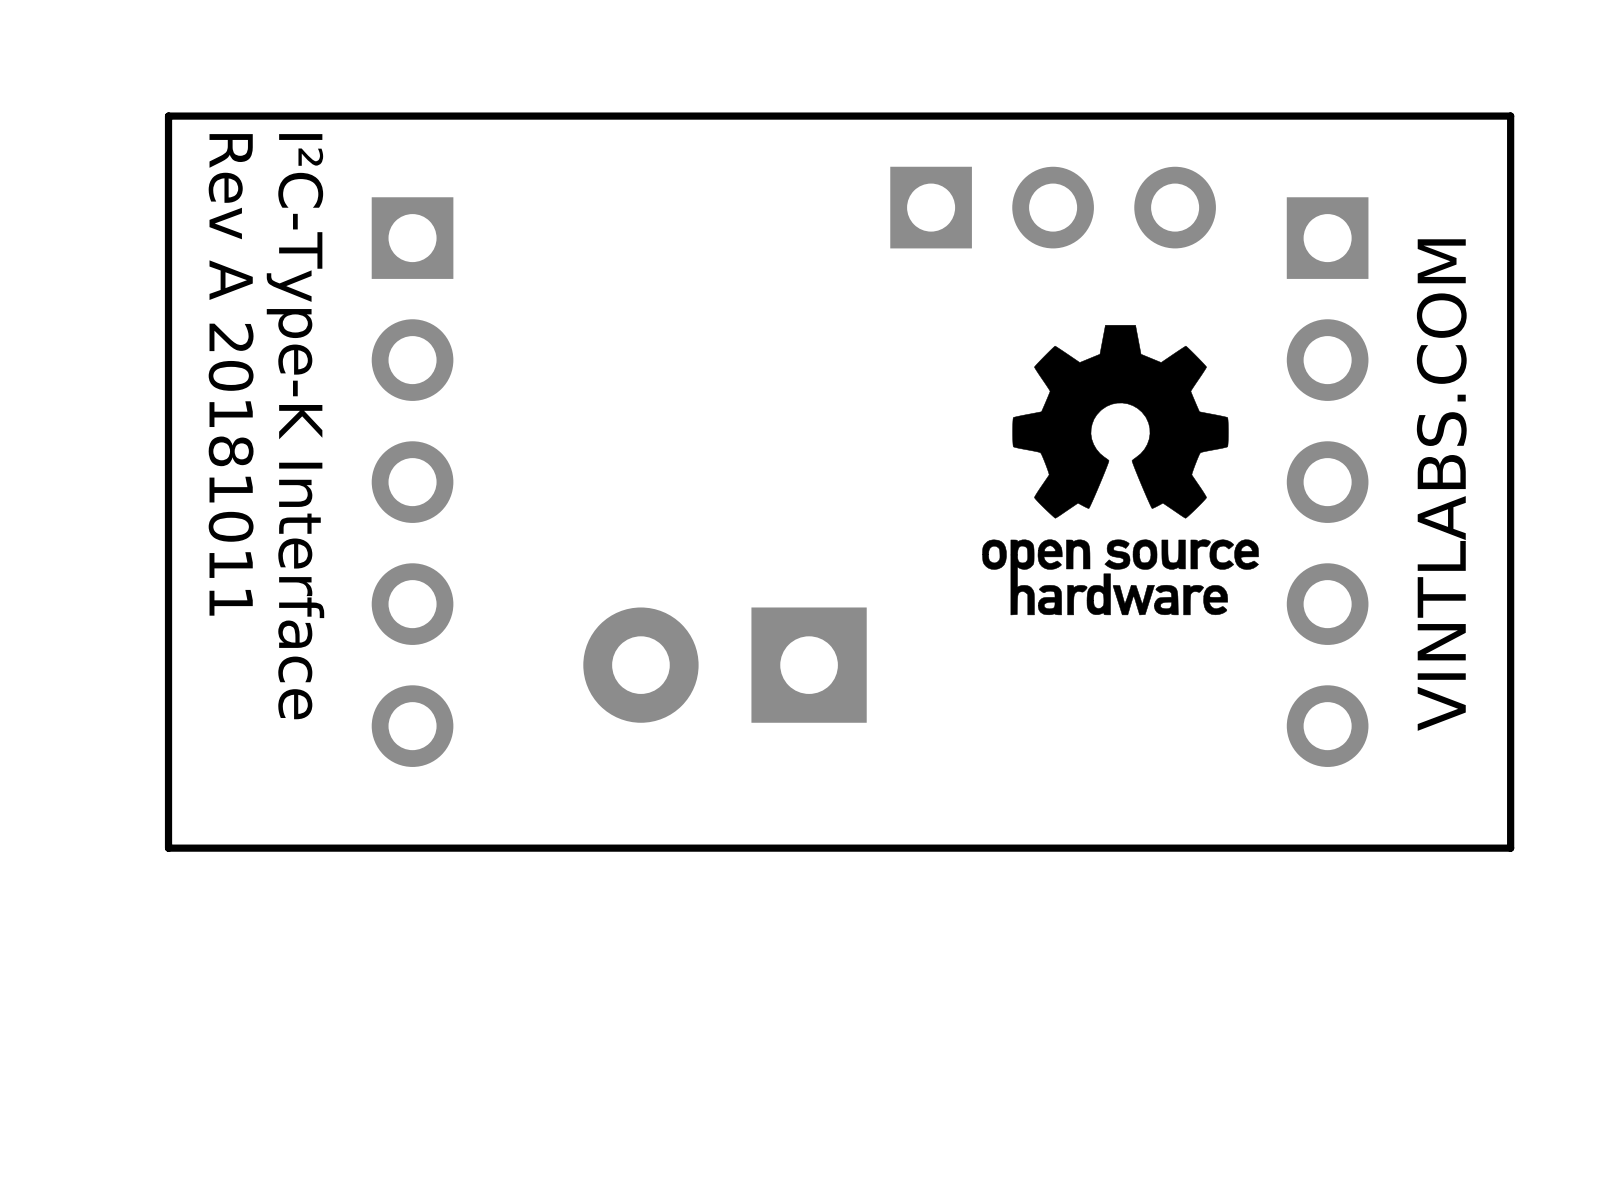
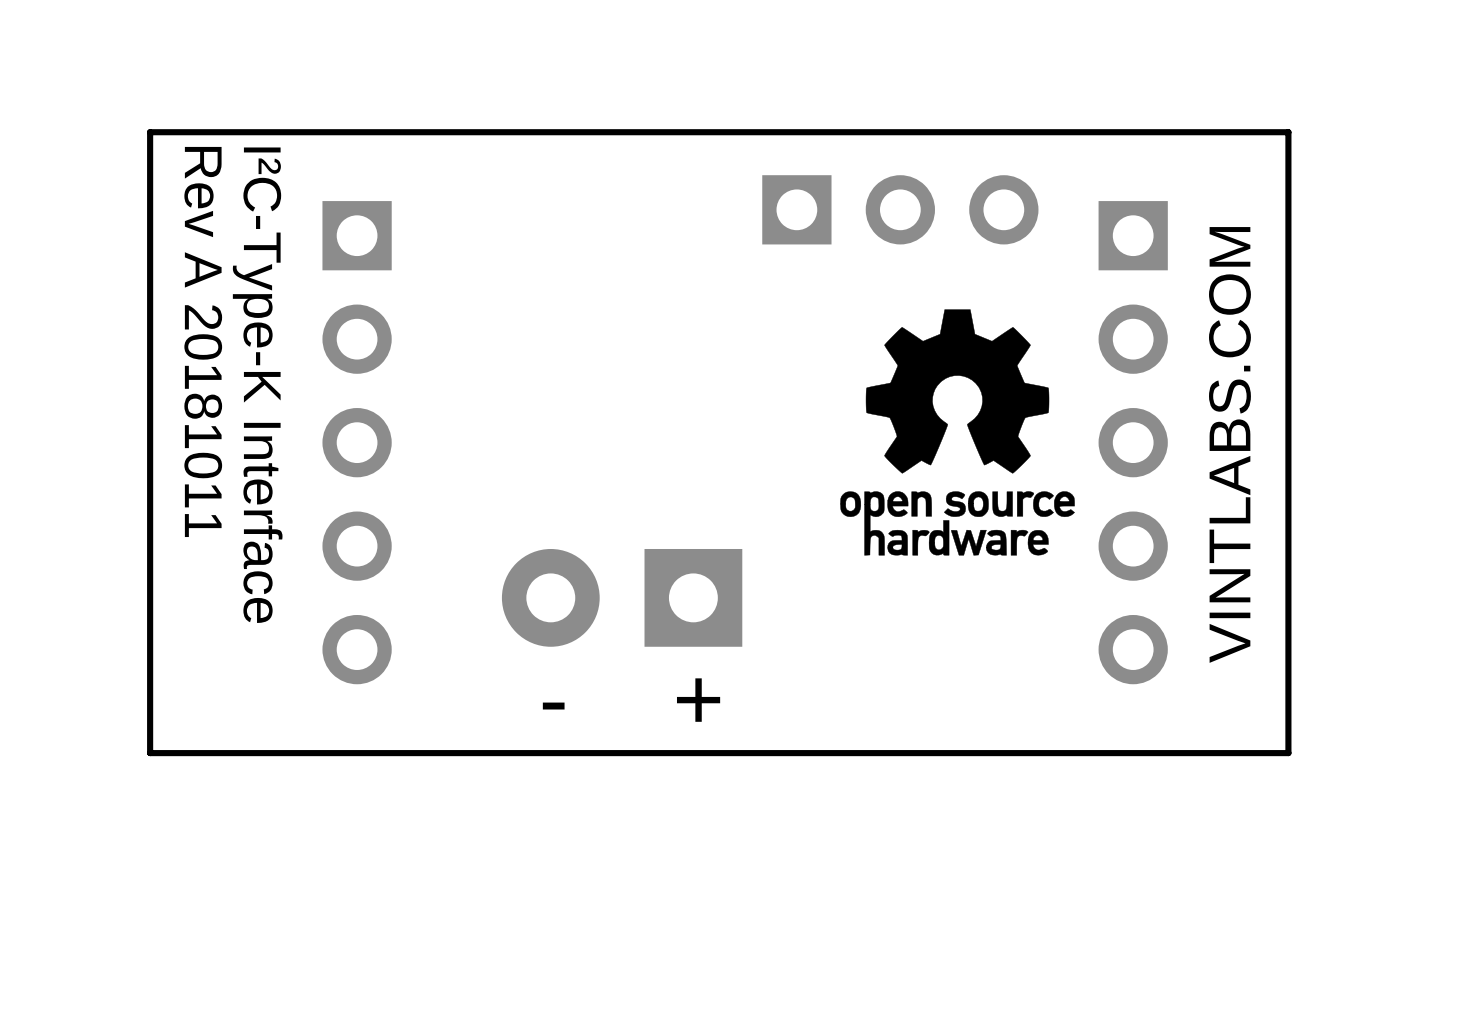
text: none -> + (698, 700)
text: none -> - (553, 706)

